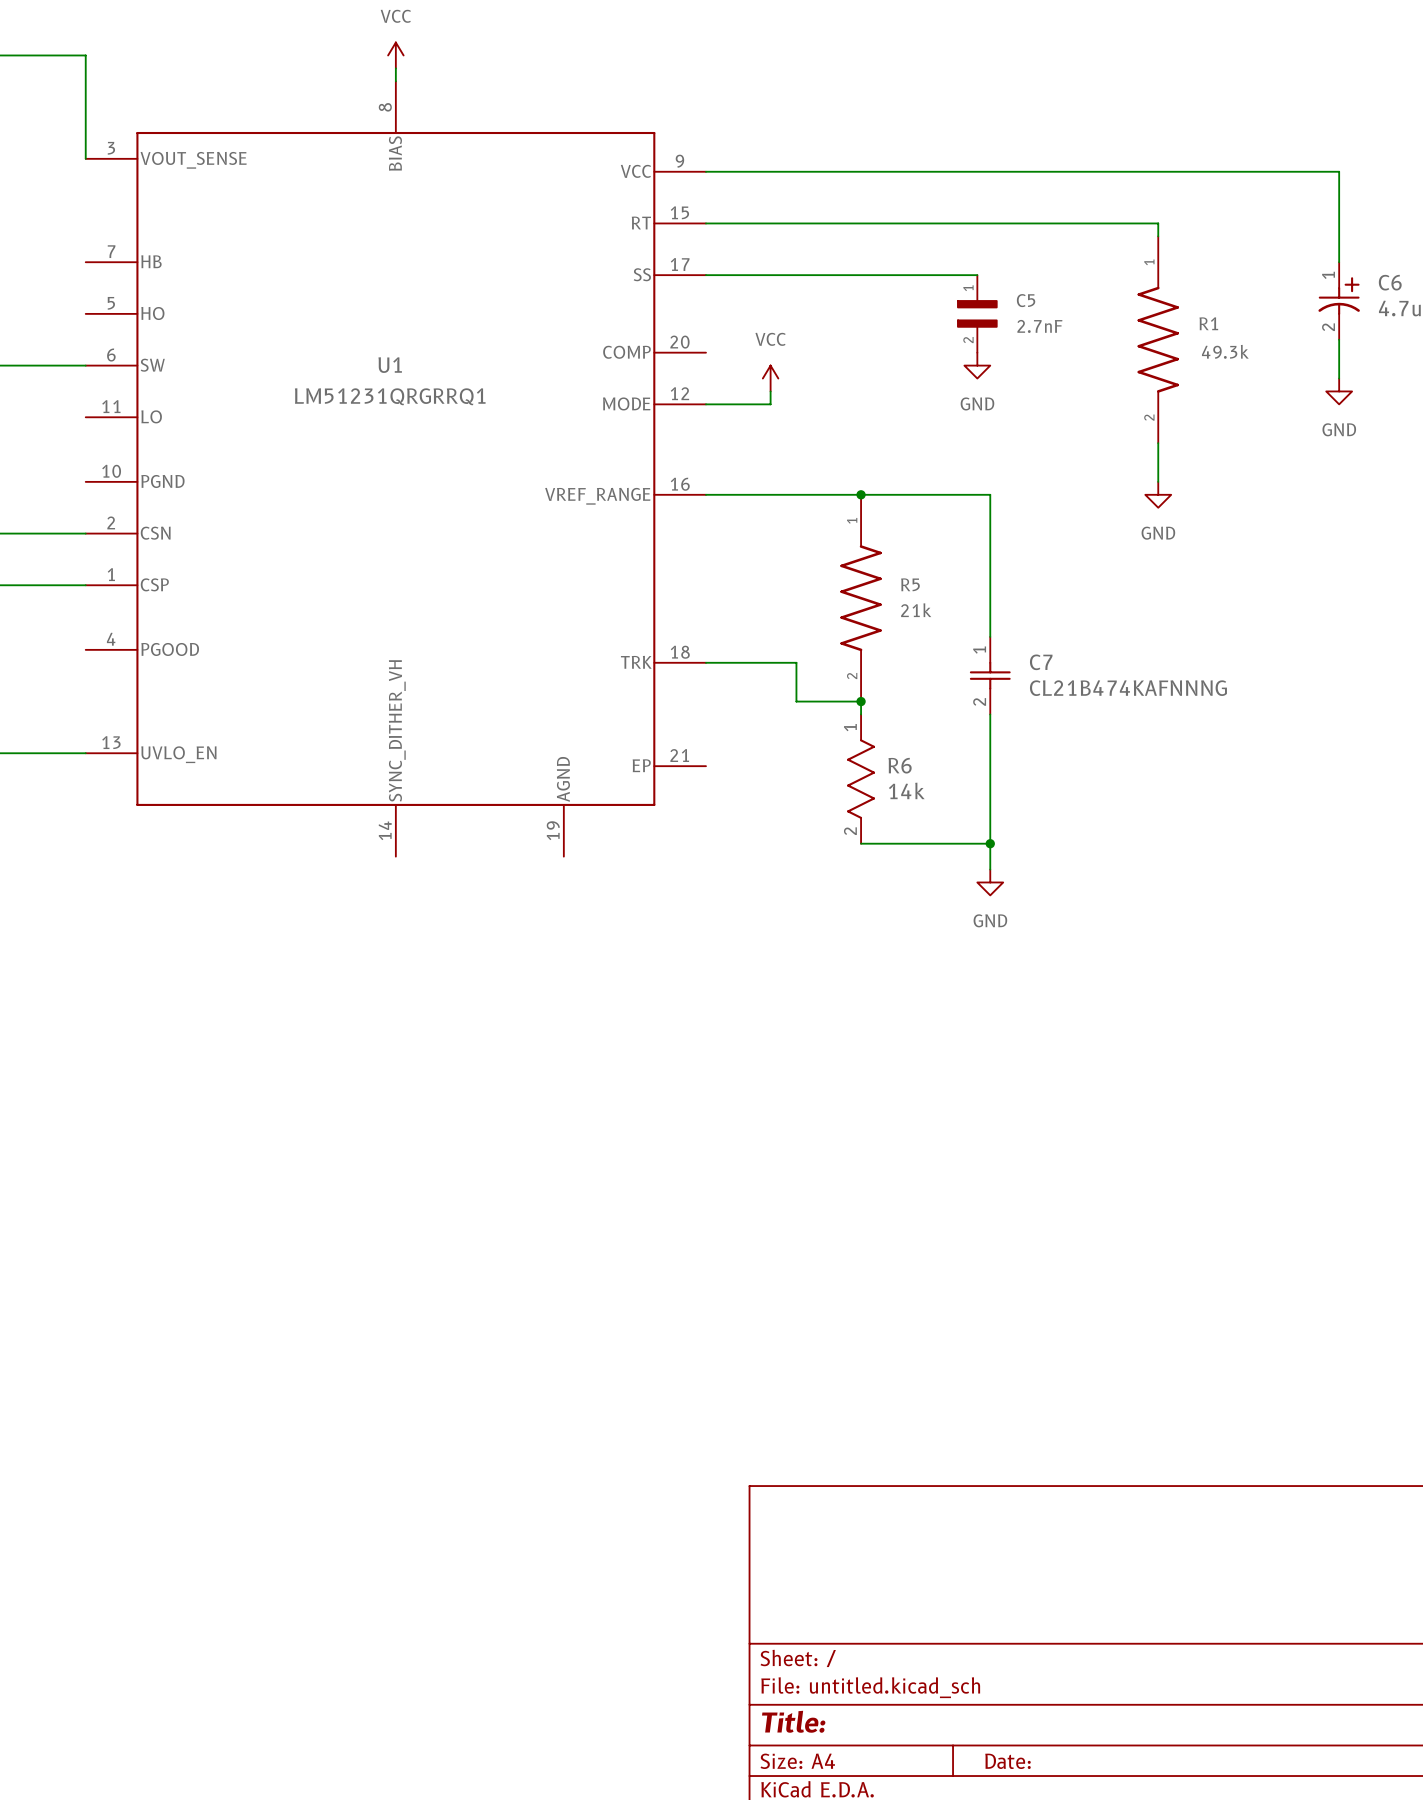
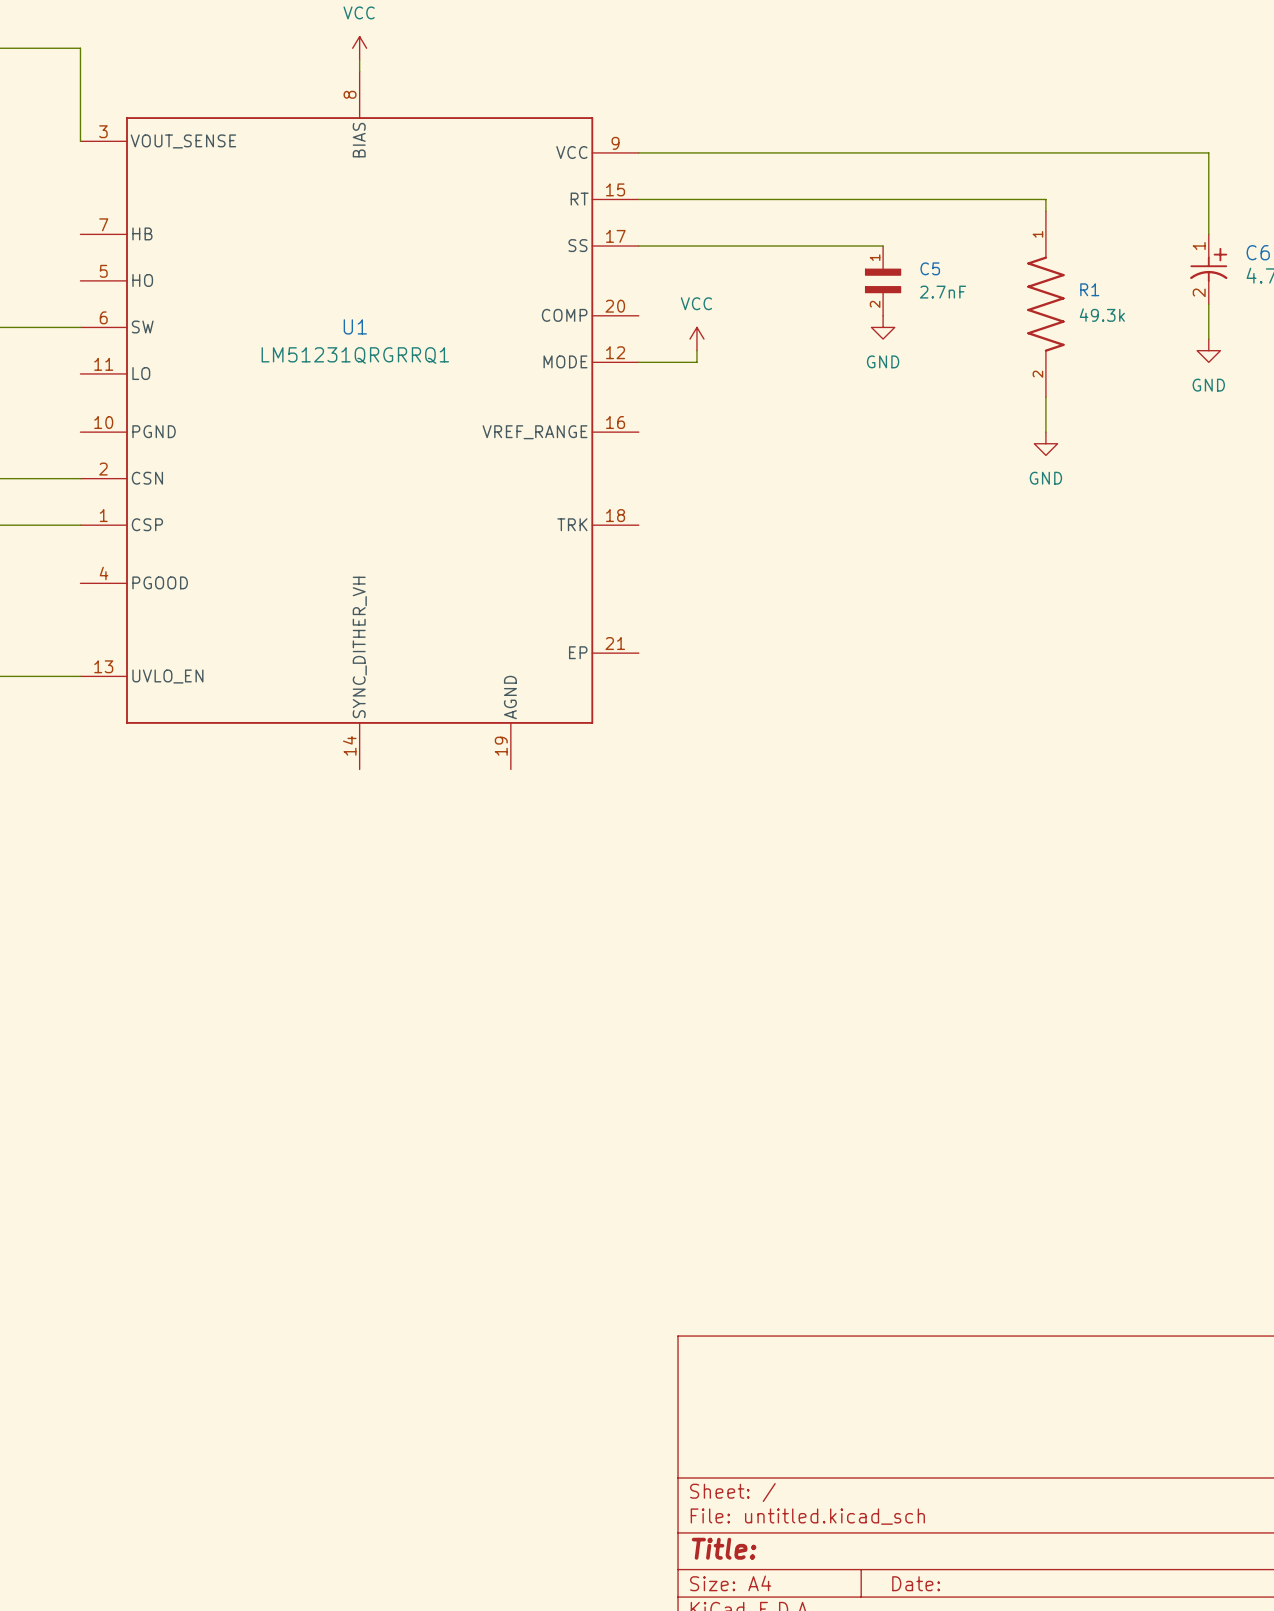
U1 symbol: [85, 81, 706, 857] -> [80, 71, 639, 770]
wire: (705, 494) (990, 494) (990, 636) -> none
junction: (861, 494) -> none
R5: 21k (861, 598) -> none
wire: (705, 662) (796, 662) (796, 701) (861, 701) (861, 714) -> none
C7: CL21B474KAFNNNG (990, 675) -> none
junction: (861, 701) -> none
wire: (990, 714) (990, 869) -> none
R6: 14k (861, 779) -> none
wire: (861, 843) (990, 843) -> none
junction: (990, 843) -> none
power symbol: GND (990, 882) -> none

